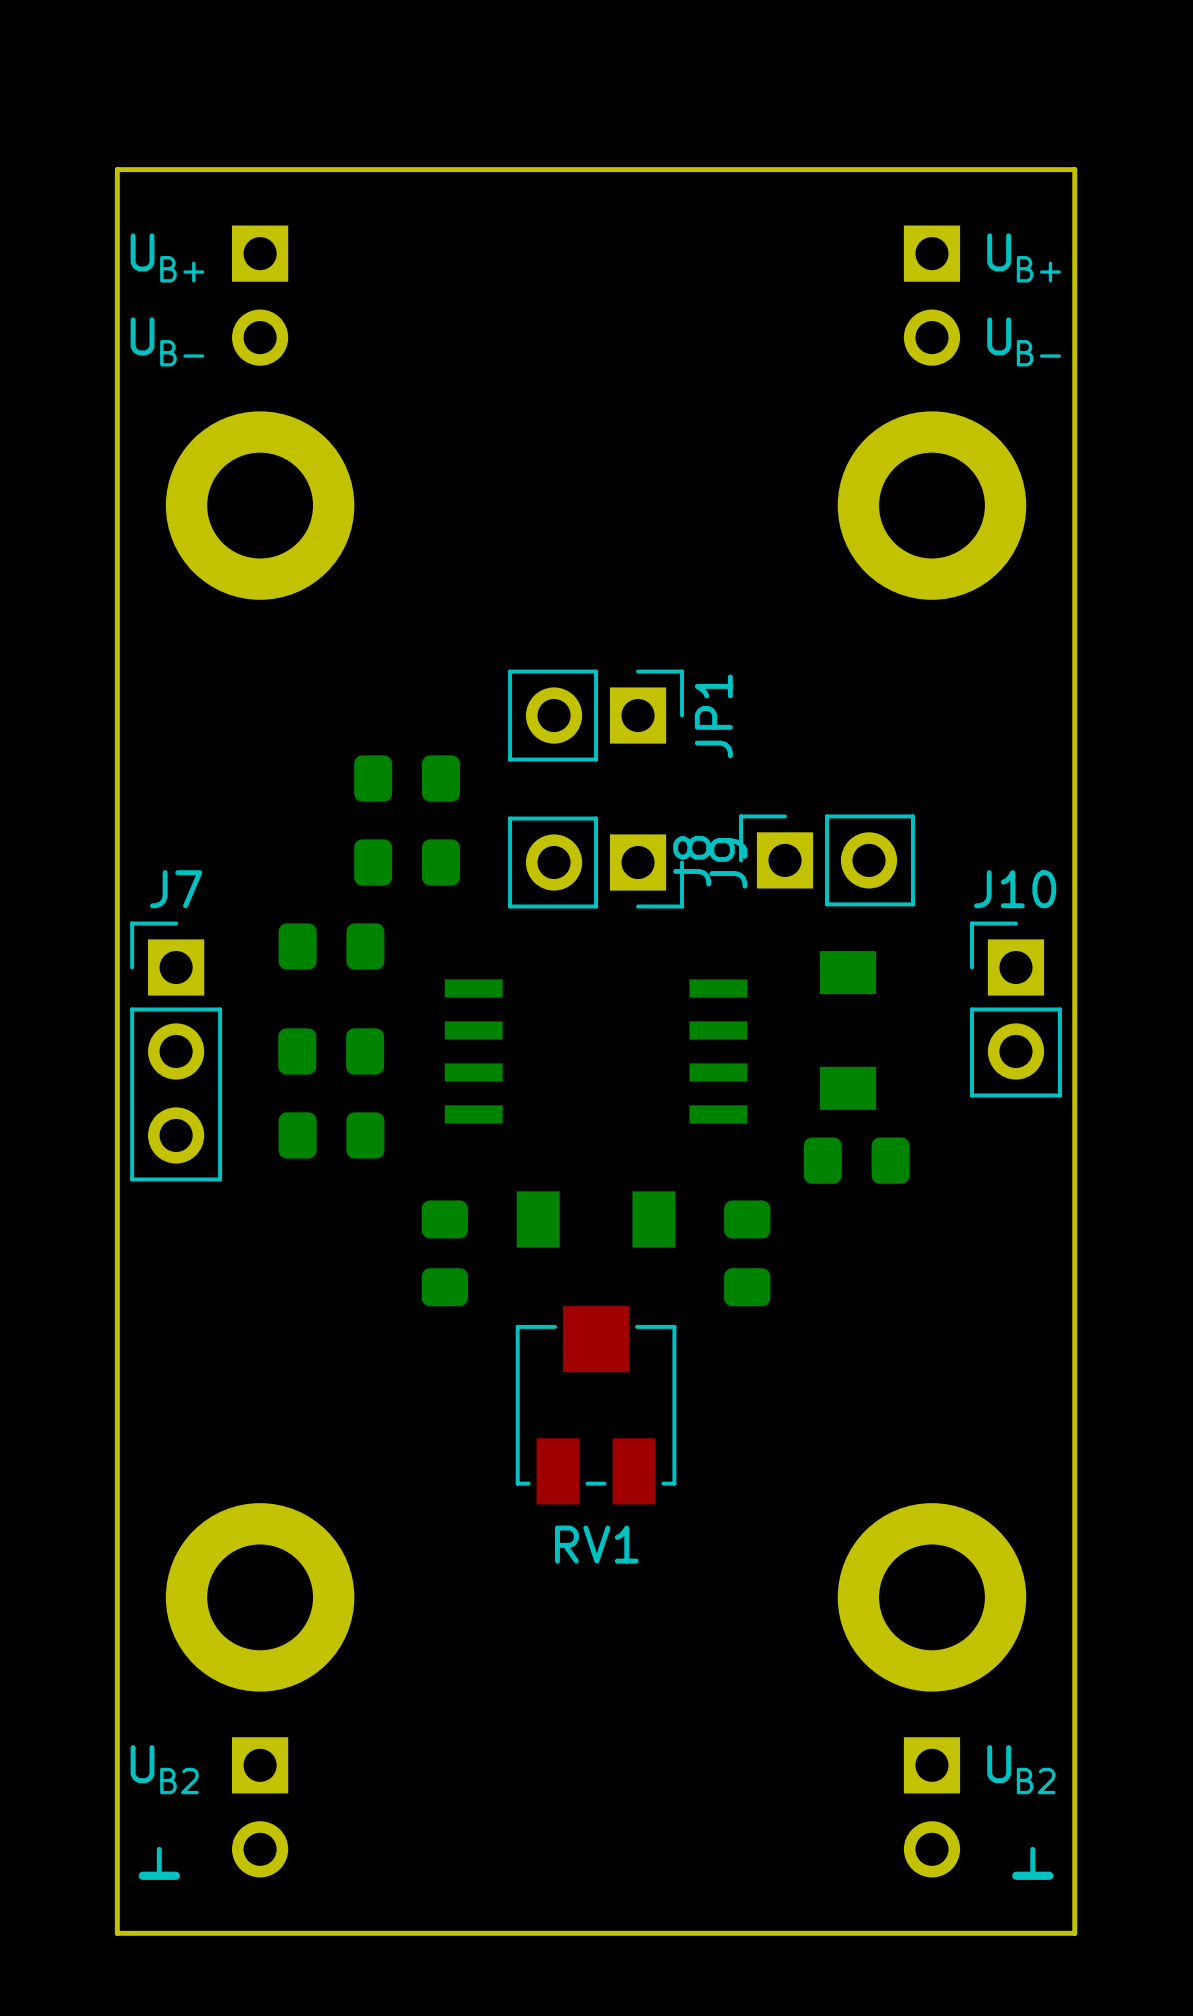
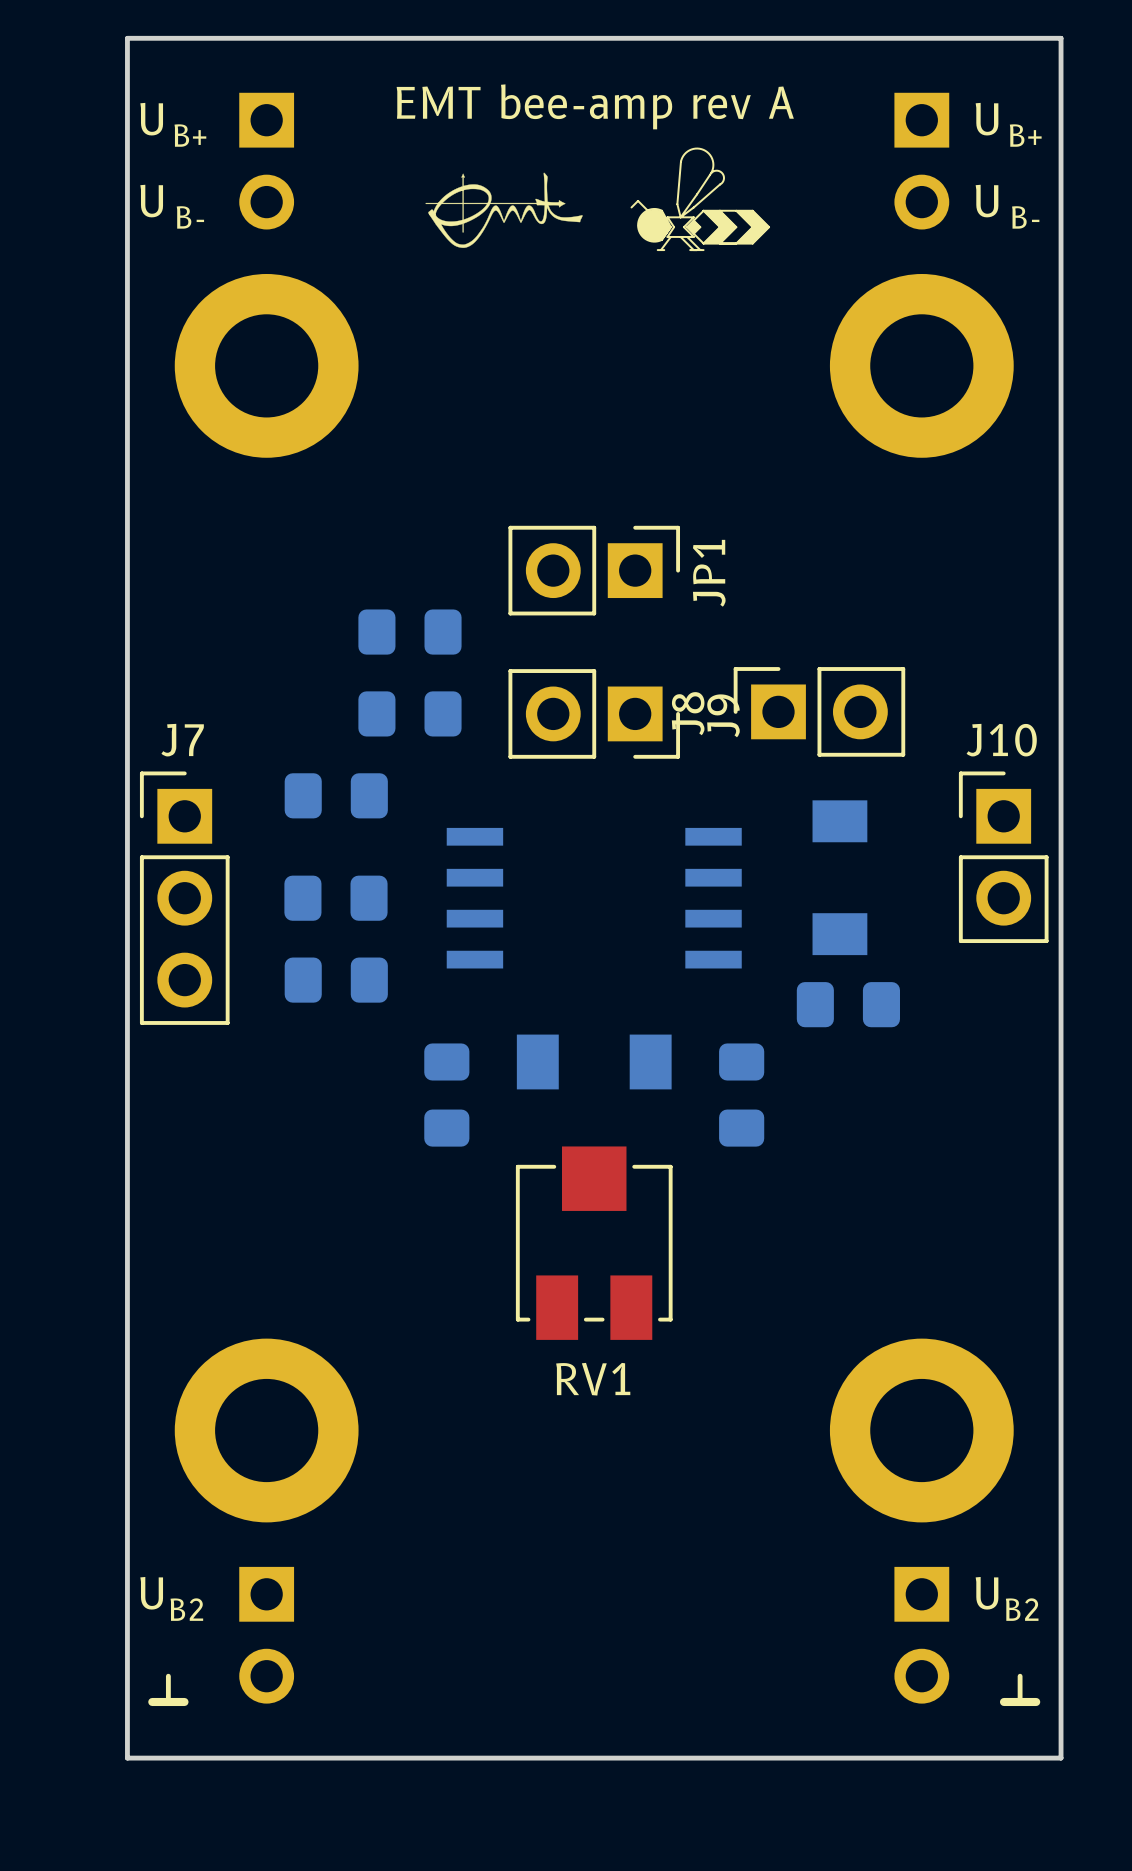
text: none -> EMT bee-amp rev A (595, 106)
drawing: none -> [630, 147, 770, 251]
drawing: none -> [425, 172, 583, 248]

